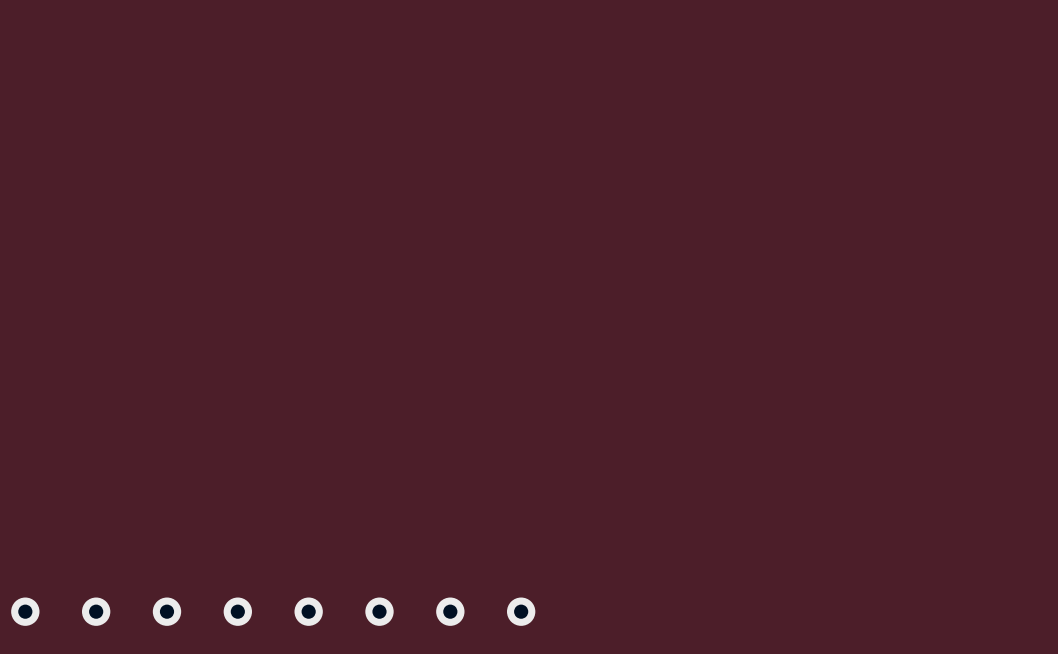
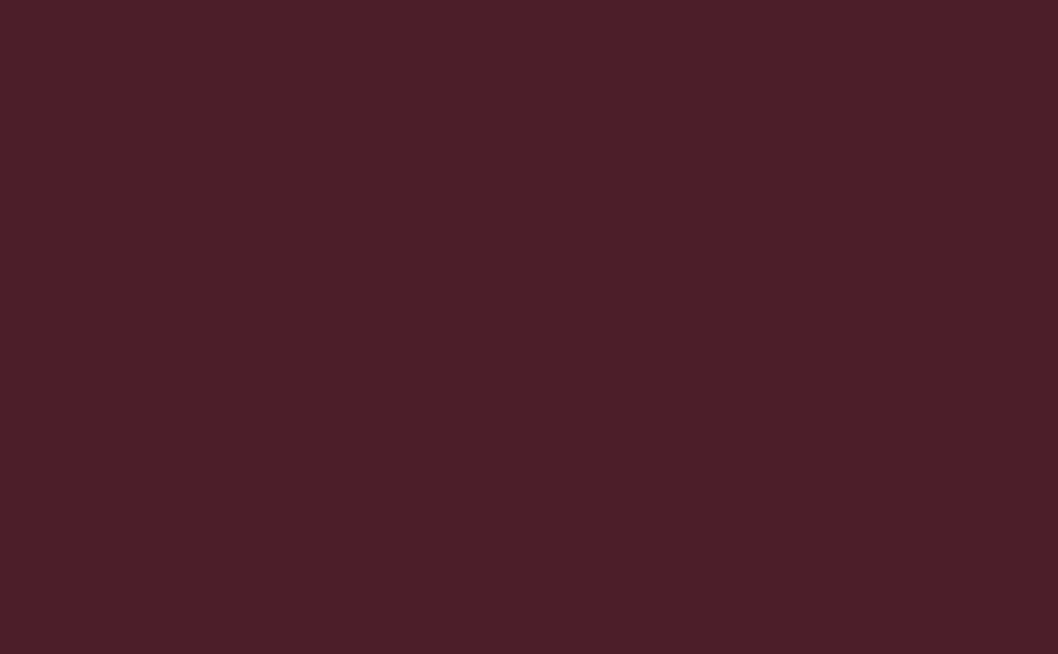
via: (25, 611) -> none
via: (96, 611) -> none
via: (166, 611) -> none
via: (237, 611) -> none
via: (308, 611) -> none
via: (379, 611) -> none
via: (450, 611) -> none
via: (521, 611) -> none

